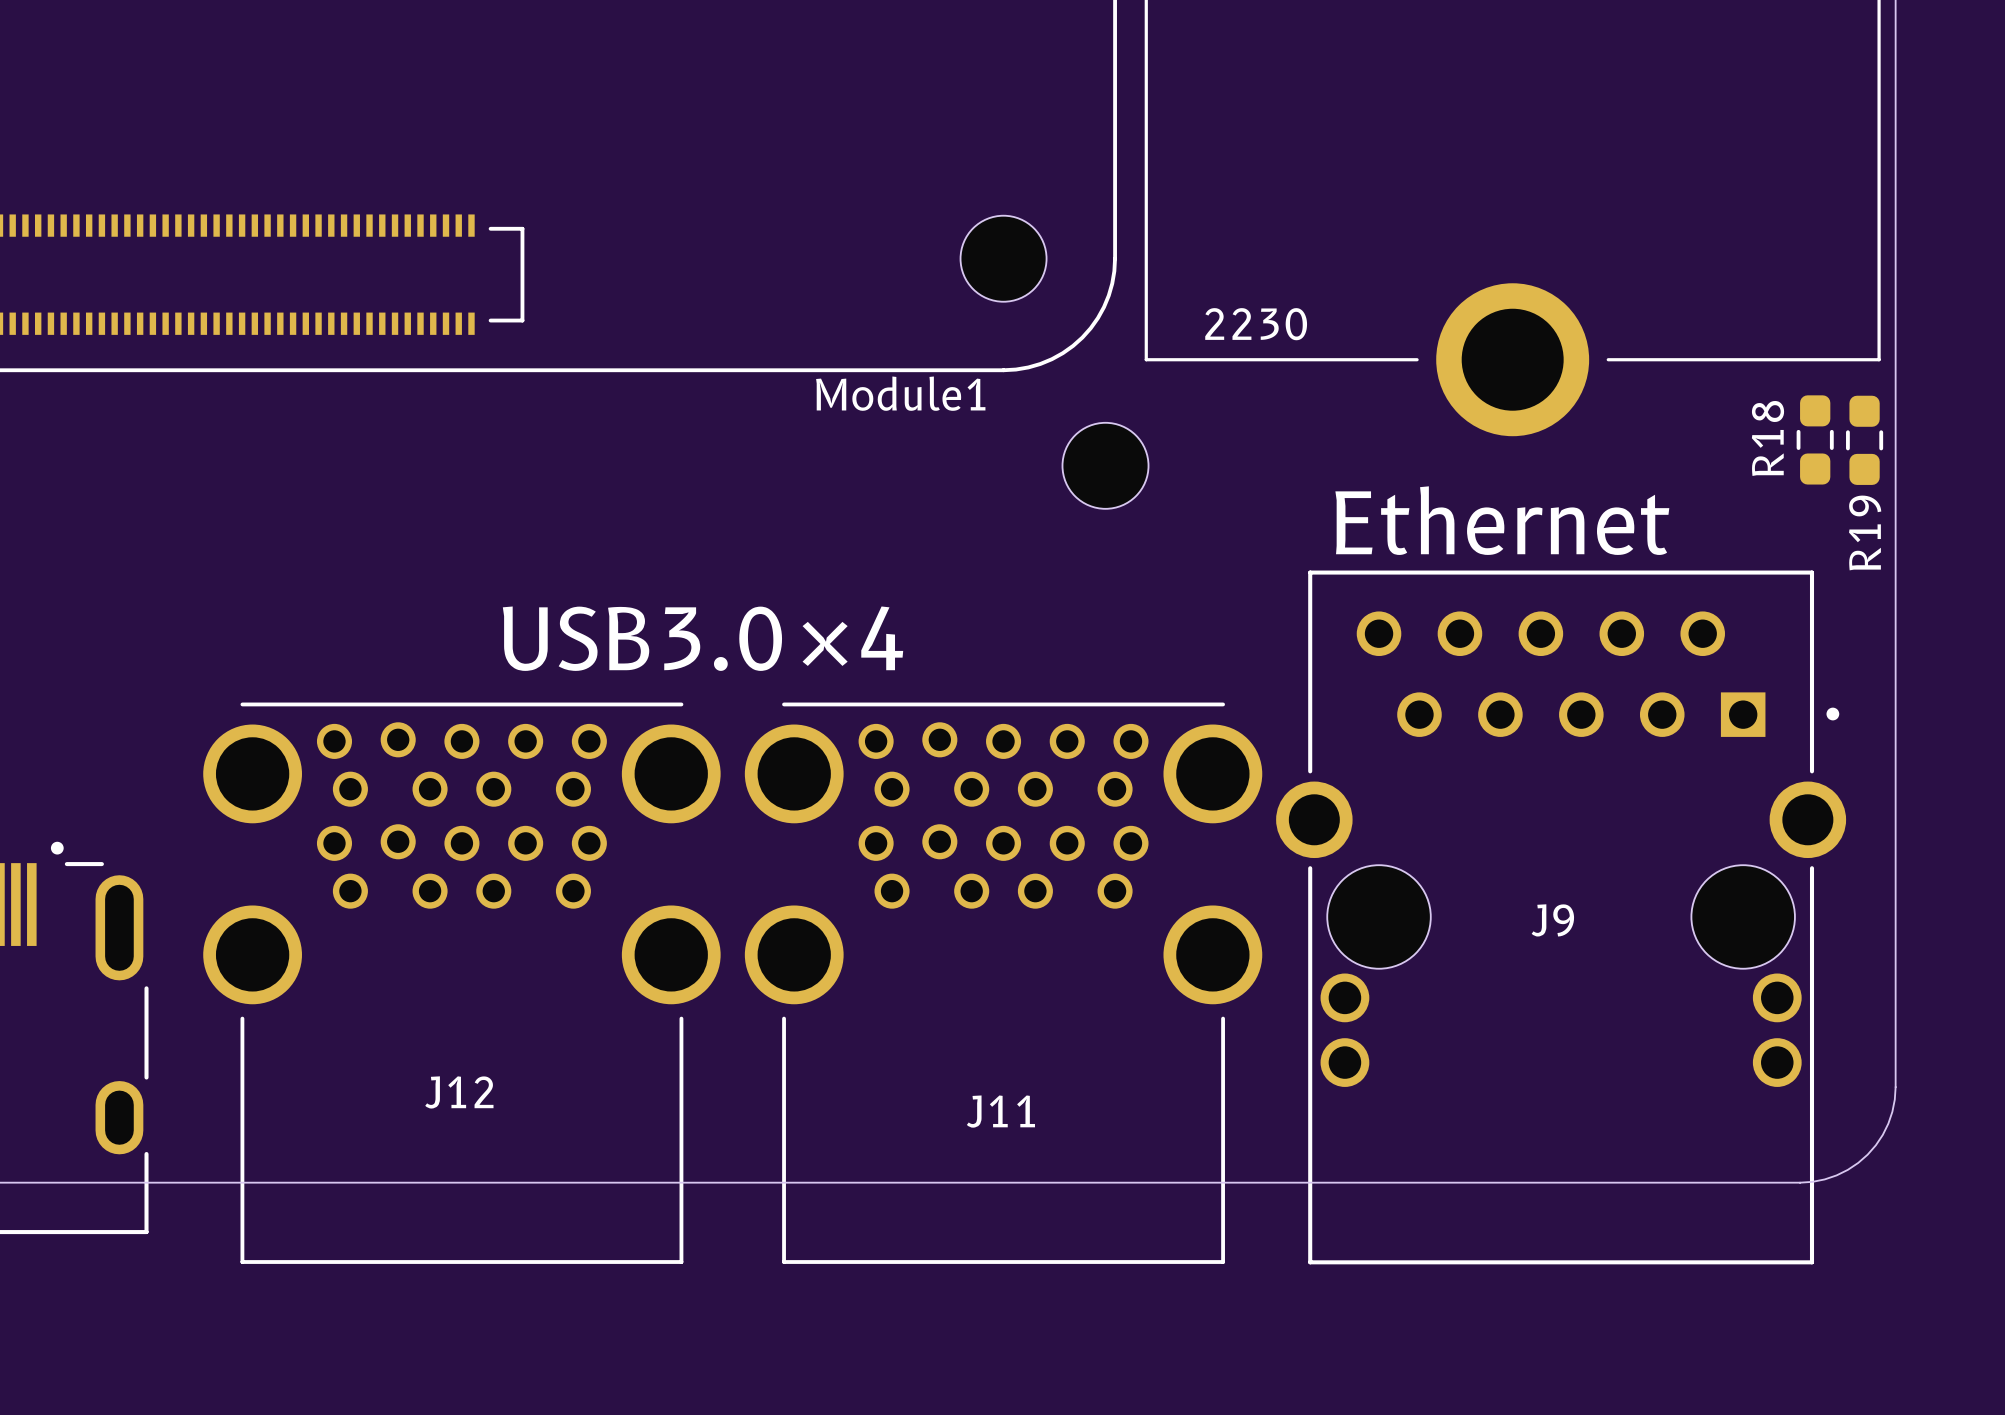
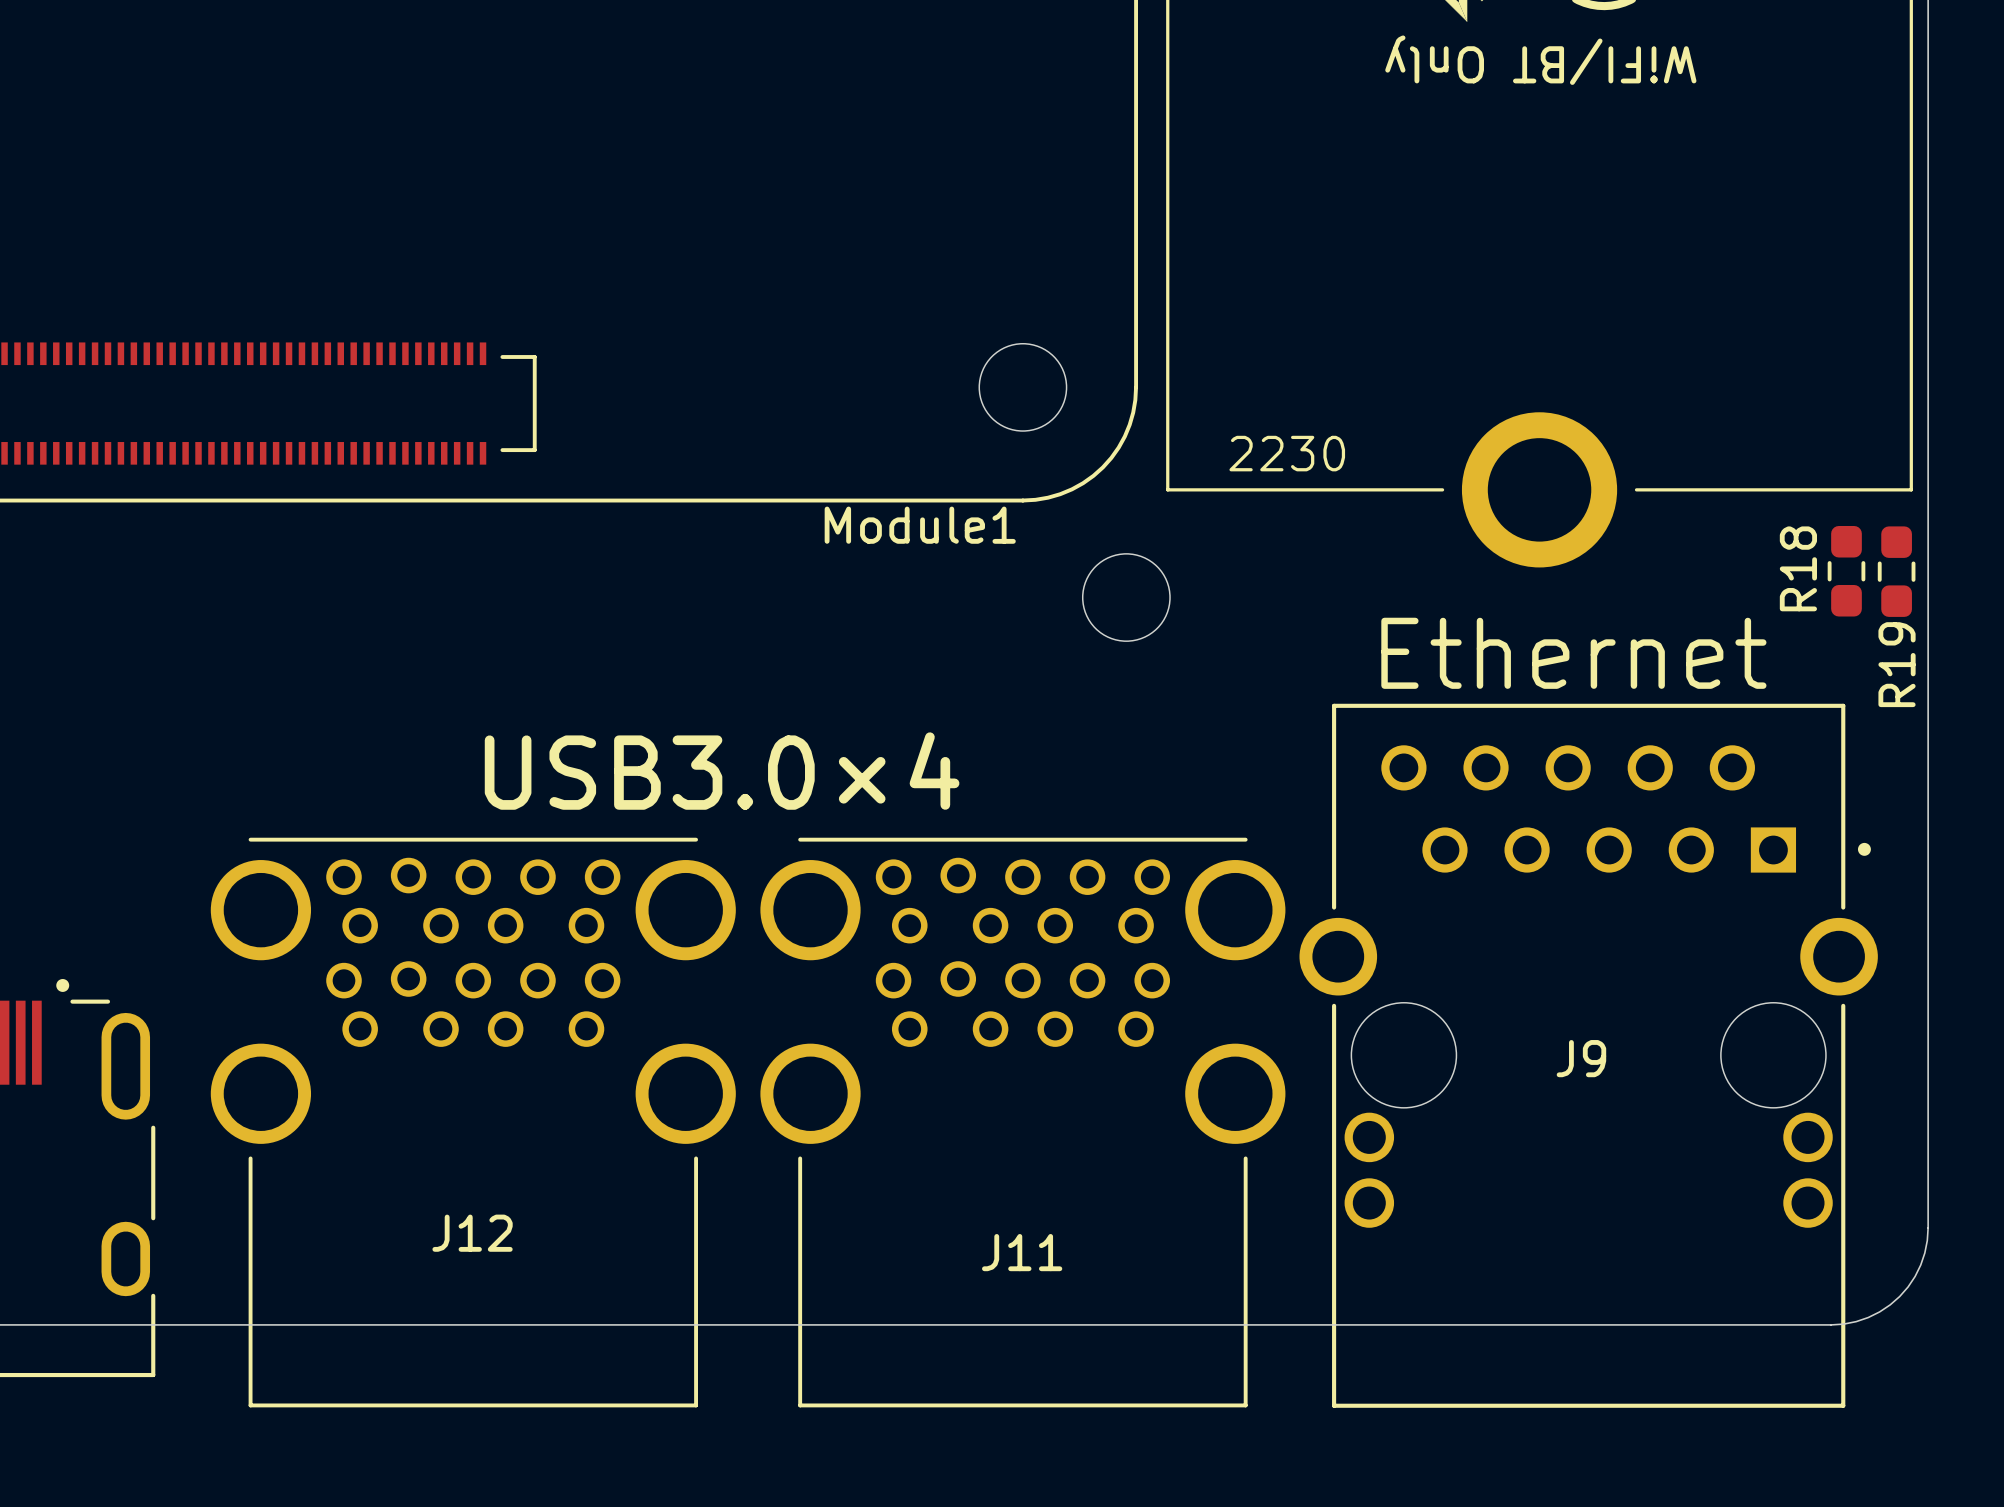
text position: Ethernet (1502, 520) -> Ethernet (1573, 653)

